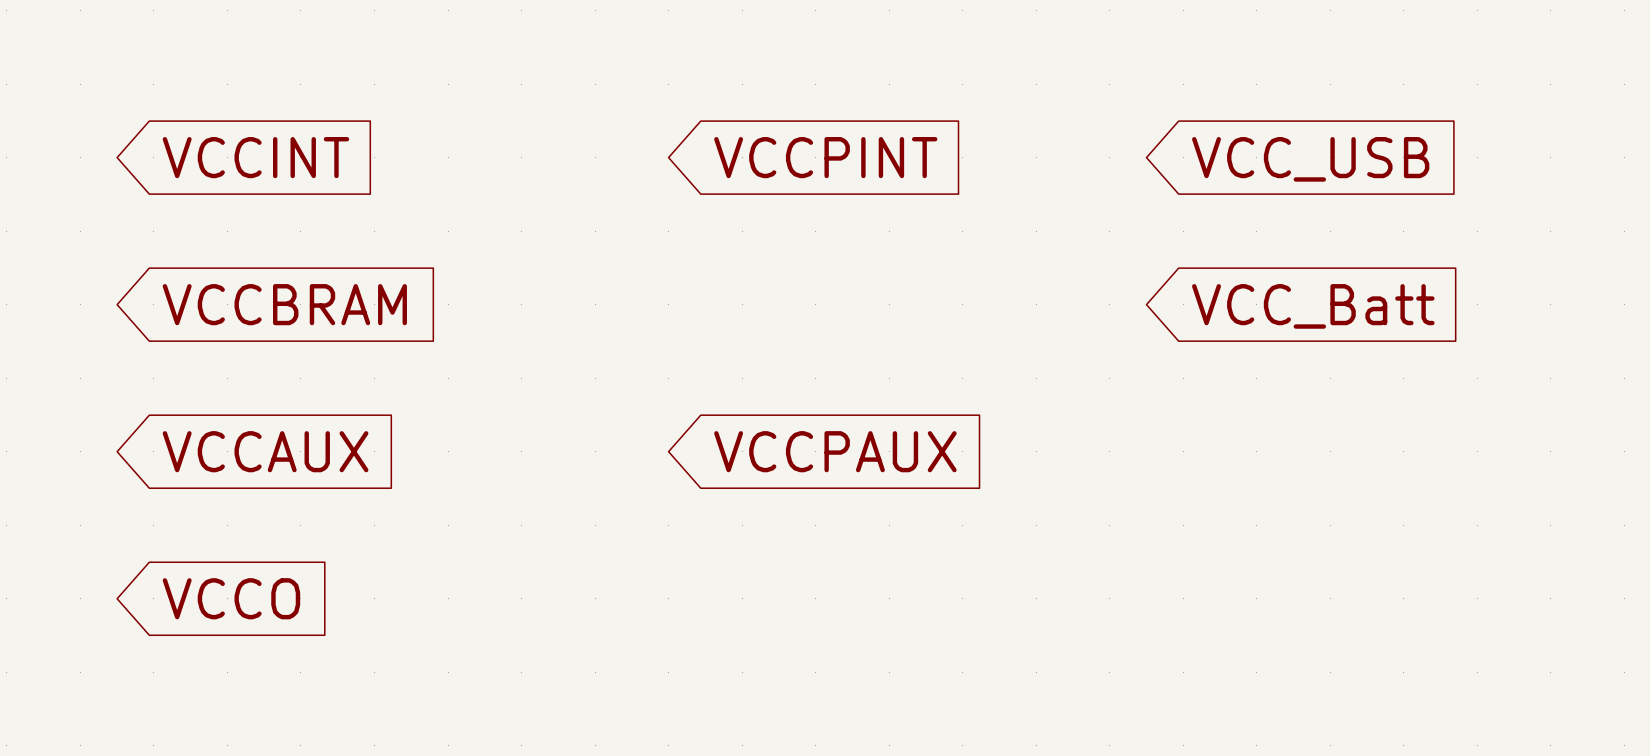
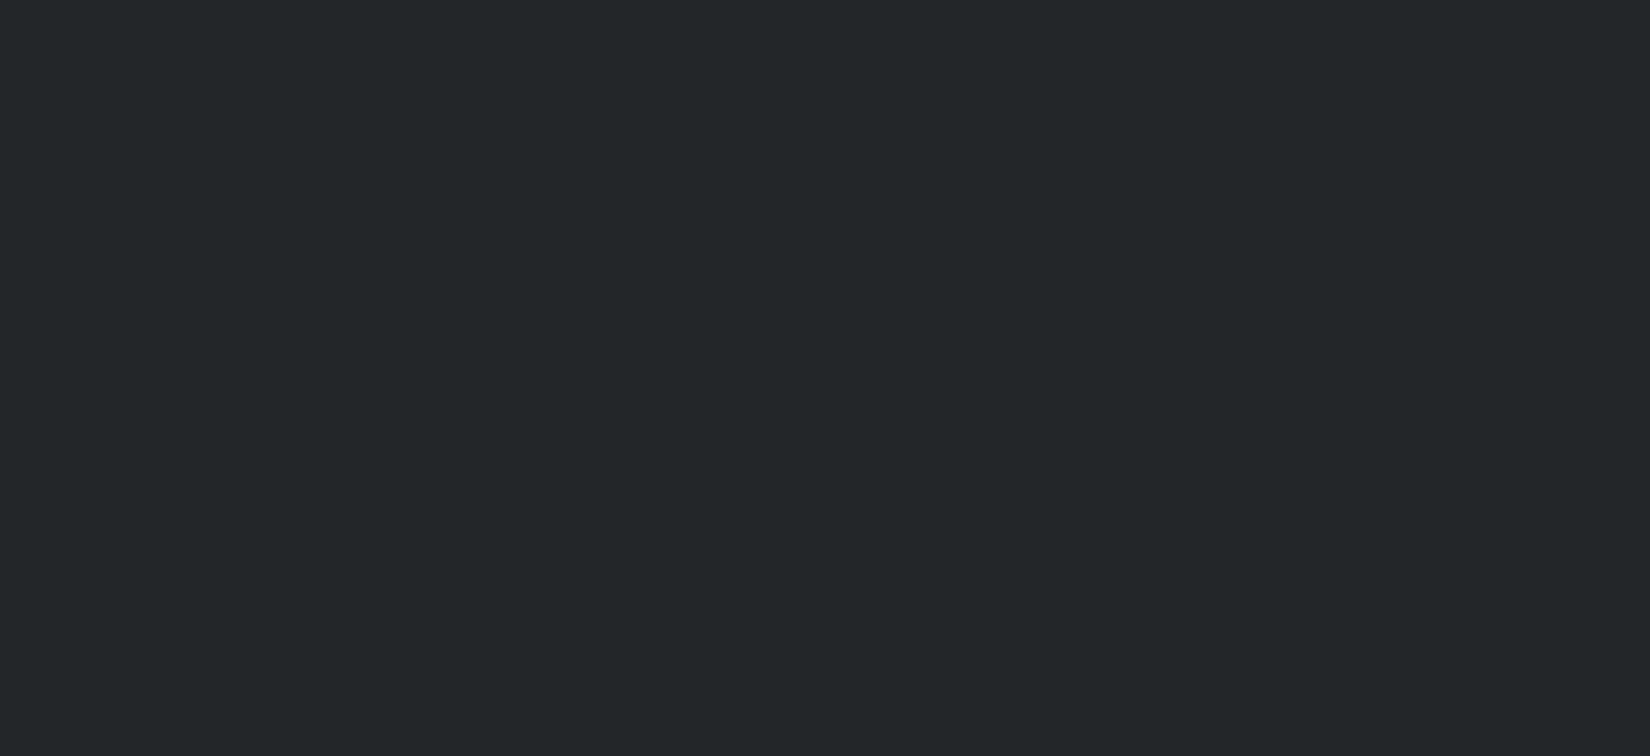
global label: VCCINT (255, 157) -> none
global label: VCCPINT (825, 157) -> none
global label: VCC_USB (1310, 159) -> none
global label: VCCBRAM (284, 304) -> none
global label: VCC_Batt (1313, 306) -> none
global label: VCCAUX (265, 451) -> none
global label: VCCPAUX (835, 451) -> none
global label: VCCO (231, 598) -> none

